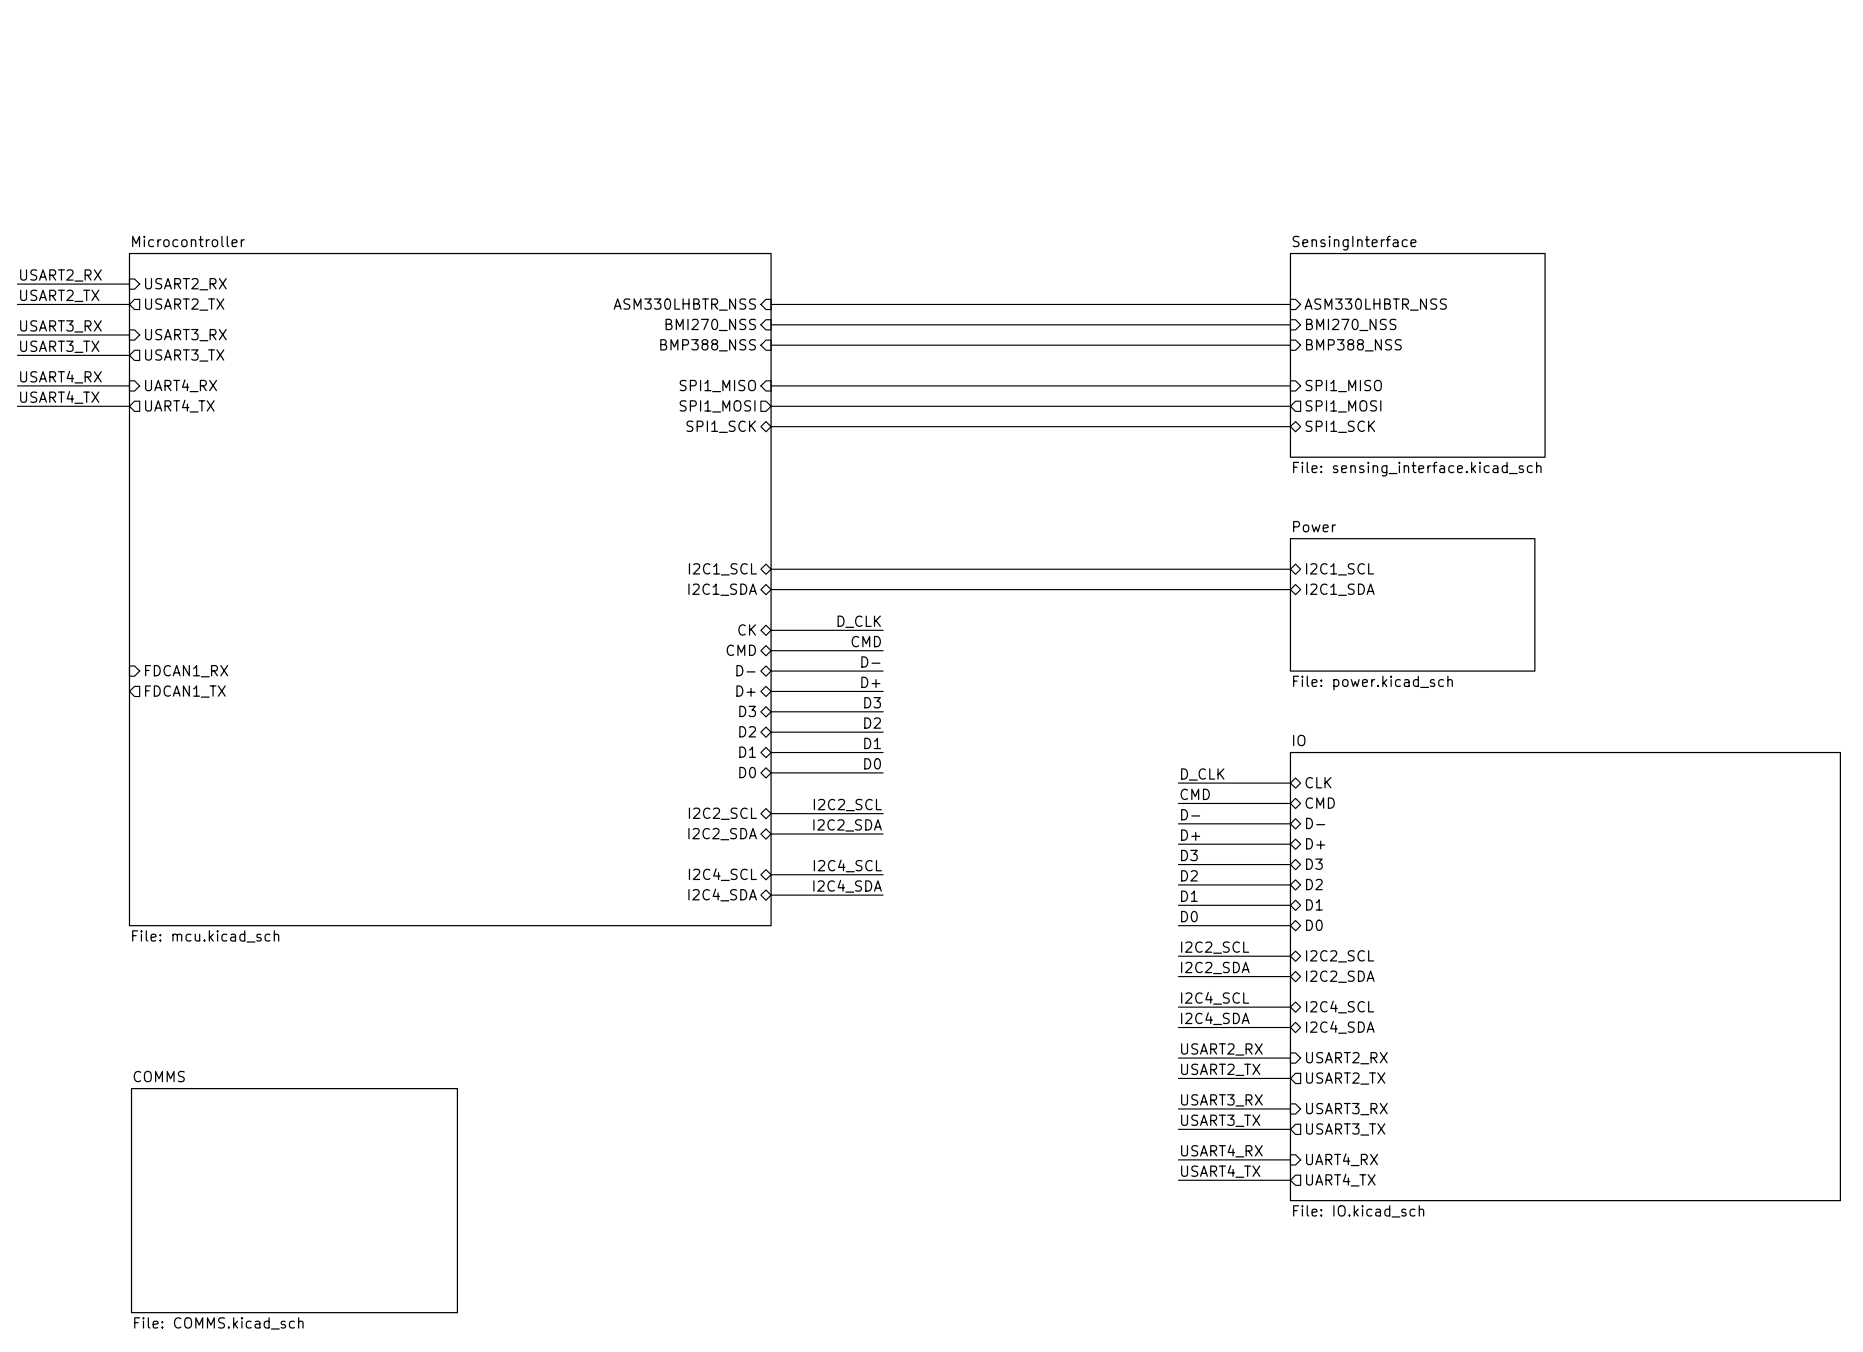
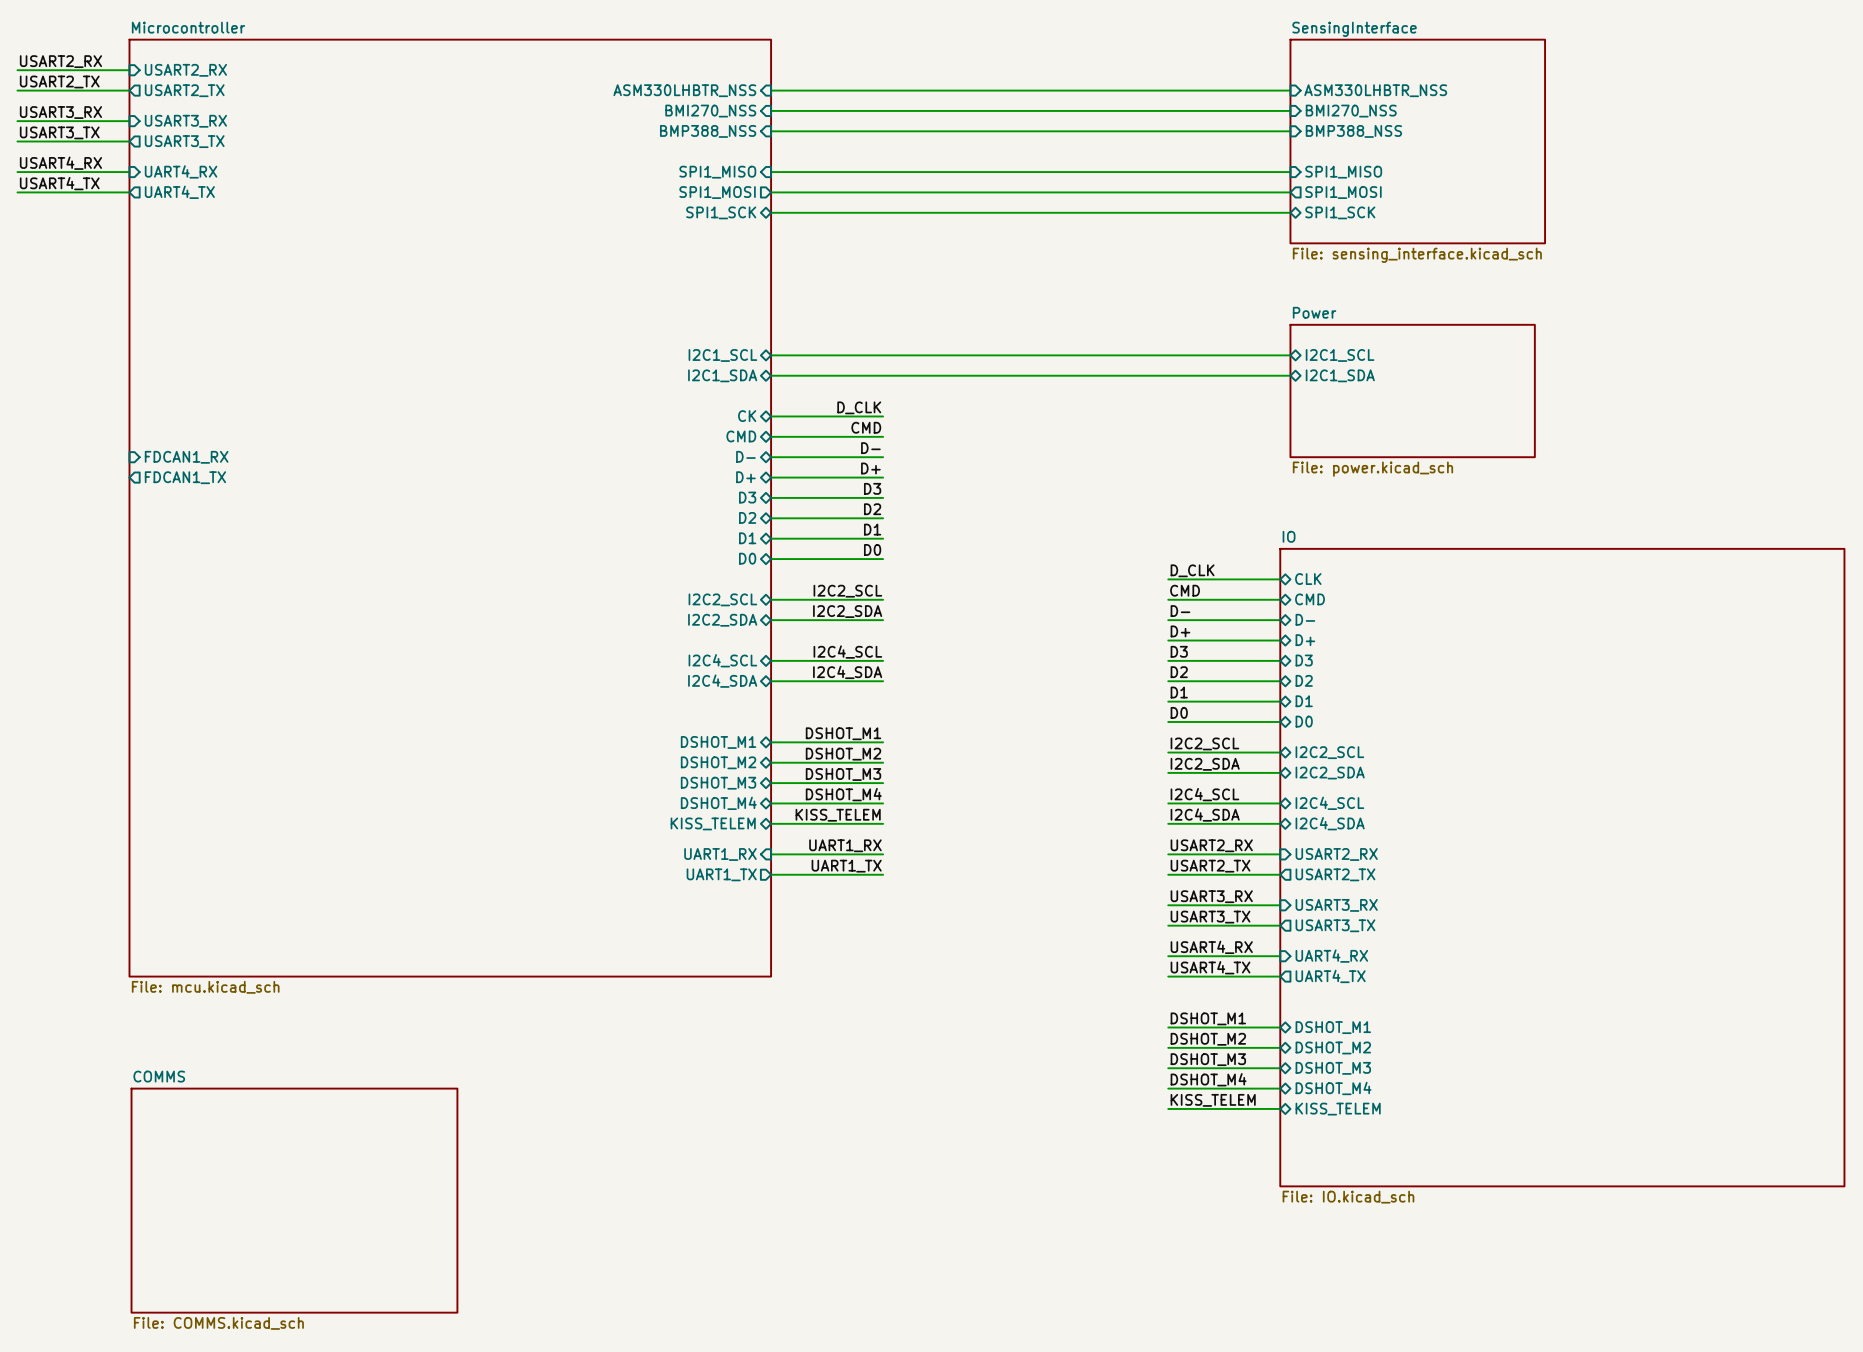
label: none -> USART2_RX (60, 61)
wire: none -> (17, 70) (129, 70)
sheet pin: none -> USART2_RX (185, 70)
label: none -> USART2_TX (59, 81)
sheet pin: none -> USART2_TX (184, 90)
sheet pin: none -> ASM330LHBTR_NSS (684, 90)
wire: none -> (771, 90) (1290, 90)
sheet pin: none -> ASM330LHBTR_NSS (1375, 90)
sheet pin: none -> BMI270_NSS (710, 111)
sheet pin: none -> BMI270_NSS (1351, 111)
label: none -> USART3_RX (60, 112)
wire: none -> (17, 121) (129, 121)
sheet pin: none -> USART3_RX (185, 121)
sheet pin: none -> BMP388_NSS (708, 131)
sheet pin: none -> BMP388_NSS (1353, 131)
label: none -> USART3_TX (59, 132)
sheet pin: none -> USART3_TX (184, 141)
sheet SensingInterface: none -> File: sensing_interface.kicad_sch (1417, 141)
label: none -> USART4_RX (60, 163)
sheet pin: none -> UART4_RX (181, 171)
sheet pin: none -> SPI1_MISO (717, 172)
sheet pin: none -> SPI1_MISO (1343, 172)
label: none -> USART4_TX (59, 183)
sheet pin: none -> UART4_TX (179, 192)
sheet pin: none -> SPI1_MOSI (717, 192)
sheet pin: none -> SPI1_MOSI (1343, 192)
sheet pin: none -> SPI1_SCK (721, 212)
sheet pin: none -> SPI1_SCK (1340, 212)
label: USART2_RX (60, 275) -> none
wire: (17, 284) (129, 284) -> (17, 90) (129, 90)
sheet pin: USART2_RX (185, 284) -> none
label: USART2_TX (59, 295) -> none
wire: (17, 304) (129, 304) -> (17, 172) (129, 172)
sheet pin: USART2_TX (184, 304) -> none
sheet pin: ASM330LHBTR_NSS (684, 304) -> none
wire: (771, 304) (1290, 304) -> (771, 110) (1290, 110)
sheet pin: ASM330LHBTR_NSS (1375, 304) -> none
sheet pin: BMI270_NSS (710, 324) -> none
wire: (771, 324) (1290, 324) -> (771, 131) (1290, 131)
sheet pin: BMI270_NSS (1351, 324) -> none
label: USART3_RX (60, 326) -> none
wire: (17, 335) (129, 335) -> (17, 141) (129, 141)
sheet pin: USART3_RX (185, 335) -> none
sheet pin: BMP388_NSS (708, 345) -> none
wire: (771, 345) (1290, 345) -> (771, 172) (1290, 172)
sheet pin: BMP388_NSS (1353, 345) -> none
label: USART3_TX (59, 346) -> none
wire: (17, 355) (129, 355) -> none
sheet pin: USART3_TX (184, 355) -> none
sheet pin: none -> I2C1_SCL (722, 355)
sheet pin: none -> I2C1_SCL (1340, 355)
sheet SensingInterface: File: sensing_interface.kicad_sch (1417, 355) -> none
sheet pin: none -> I2C1_SDA (722, 375)
sheet pin: none -> I2C1_SDA (1340, 375)
label: USART4_RX (60, 377) -> none
wire: (17, 385) (129, 385) -> (17, 192) (129, 192)
sheet pin: UART4_RX (181, 385) -> none
wire: (771, 385) (1290, 385) -> (771, 192) (1290, 192)
sheet pin: SPI1_MISO (717, 386) -> none
sheet pin: SPI1_MISO (1343, 386) -> none
sheet Power: none -> File: power.kicad_sch (1412, 391)
label: USART4_TX (59, 397) -> none
wire: (17, 406) (129, 406) -> none
sheet pin: UART4_TX (179, 406) -> none
sheet pin: SPI1_MOSI (717, 406) -> none
wire: (771, 406) (1290, 406) -> (771, 212) (1290, 212)
sheet pin: SPI1_MOSI (1343, 406) -> none
label: none -> D_CLK (859, 407)
sheet pin: none -> CK (747, 416)
wire: none -> (771, 416) (883, 416)
sheet pin: SPI1_SCK (721, 426) -> none
wire: (771, 426) (1290, 426) -> (771, 355) (1290, 355)
sheet pin: SPI1_SCK (1340, 426) -> none
label: none -> CMD (866, 427)
sheet pin: none -> CMD (741, 436)
label: none -> D- (870, 448)
sheet pin: none -> D- (745, 456)
sheet pin: none -> FDCAN1_RX (186, 457)
label: none -> D+ (870, 468)
sheet pin: none -> FDCAN1_TX (185, 477)
sheet pin: none -> D+ (745, 477)
label: none -> D3 (872, 488)
sheet pin: none -> D3 (747, 497)
sheet Microcontroller: none -> File: mcu.kicad_sch (450, 508)
label: none -> D2 (872, 509)
sheet pin: none -> D2 (747, 517)
label: none -> D1 (872, 529)
sheet pin: none -> D1 (747, 538)
label: none -> D0 (872, 549)
sheet pin: none -> D0 (747, 558)
sheet pin: I2C1_SCL (722, 569) -> none
wire: (771, 569) (1290, 569) -> (771, 375) (1290, 375)
sheet pin: I2C1_SCL (1340, 569) -> none
label: none -> D_CLK (1192, 570)
wire: none -> (1168, 579) (1280, 579)
sheet pin: none -> CLK (1308, 579)
sheet Microcontroller: File: mcu.kicad_sch (450, 589) -> none
sheet pin: I2C1_SDA (722, 589) -> I2C2_SCL (722, 599)
wire: (771, 589) (1290, 589) -> none
sheet pin: I2C1_SDA (1340, 589) -> none
label: none -> CMD (1185, 590)
label: none -> I2C2_SCL (847, 591)
wire: none -> (771, 599) (883, 599)
wire: none -> (1168, 599) (1280, 599)
sheet pin: none -> CMD (1310, 599)
sheet Power: File: power.kicad_sch (1412, 604) -> none
label: none -> I2C2_SDA (847, 611)
label: none -> D- (1180, 611)
sheet pin: none -> D- (1305, 619)
sheet pin: none -> I2C2_SDA (722, 620)
wire: none -> (1168, 620) (1280, 620)
label: D_CLK (859, 621) -> none
sheet pin: CK (747, 629) -> none
wire: (771, 630) (883, 630) -> (771, 436) (883, 436)
label: none -> D+ (1180, 631)
wire: none -> (1168, 640) (1280, 640)
sheet pin: none -> D+ (1305, 640)
label: CMD (866, 641) -> none
sheet pin: CMD (741, 650) -> none
wire: (771, 650) (883, 650) -> (771, 457) (883, 457)
label: none -> D3 (1179, 651)
label: none -> I2C4_SCL (847, 652)
sheet pin: none -> I2C4_SCL (722, 660)
sheet pin: none -> D3 (1304, 660)
label: D- (870, 661) -> none
sheet pin: D- (745, 670) -> none
sheet pin: FDCAN1_RX (186, 671) -> none
wire: (771, 671) (883, 671) -> (771, 477) (883, 477)
label: none -> I2C4_SDA (847, 672)
label: none -> D2 (1179, 672)
sheet pin: none -> D2 (1304, 680)
sheet pin: none -> I2C4_SDA (722, 681)
wire: none -> (1168, 681) (1280, 681)
label: D+ (870, 682) -> none
sheet pin: FDCAN1_TX (185, 691) -> none
sheet pin: D+ (745, 691) -> none
wire: (771, 691) (883, 691) -> (771, 497) (883, 497)
label: none -> D1 (1179, 692)
wire: none -> (1168, 701) (1280, 701)
sheet pin: none -> D1 (1304, 701)
label: D3 (872, 702) -> none
sheet pin: D3 (747, 711) -> none
wire: (771, 711) (883, 711) -> (771, 518) (883, 518)
label: none -> D0 (1179, 712)
wire: none -> (1168, 721) (1280, 721)
sheet pin: none -> D0 (1304, 721)
label: D2 (872, 723) -> none
sheet pin: D2 (747, 731) -> none
wire: (771, 732) (883, 732) -> (771, 538) (883, 538)
label: none -> DSHOT_M1 (843, 733)
sheet pin: none -> DSHOT_M1 (718, 742)
wire: none -> (771, 742) (883, 742)
label: D1 (872, 743) -> none
label: none -> I2C2_SCL (1204, 743)
sheet pin: D1 (747, 752) -> none
wire: (771, 752) (883, 752) -> (771, 559) (883, 559)
wire: none -> (1168, 752) (1280, 752)
sheet pin: none -> I2C2_SCL (1329, 752)
label: none -> DSHOT_M2 (843, 754)
sheet pin: none -> DSHOT_M2 (718, 762)
label: D0 (872, 763) -> none
label: none -> I2C2_SDA (1205, 764)
sheet pin: D0 (747, 772) -> none
wire: (771, 772) (883, 772) -> (771, 660) (883, 660)
sheet pin: none -> I2C2_SDA (1330, 773)
label: none -> DSHOT_M3 (843, 774)
label: D_CLK (1202, 774) -> none
sheet pin: CLK (1318, 782) -> none
sheet pin: none -> DSHOT_M3 (718, 783)
wire: none -> (771, 783) (883, 783)
wire: (1178, 783) (1290, 783) -> (1168, 772) (1280, 772)
label: none -> DSHOT_M4 (843, 794)
label: CMD (1195, 794) -> none
label: none -> I2C4_SCL (1204, 794)
sheet pin: none -> DSHOT_M4 (718, 803)
wire: none -> (771, 803) (883, 803)
wire: (1280, 803) (1290, 803) -> (1168, 803) (1178, 803)
sheet pin: CMD (1320, 803) -> none
sheet pin: none -> I2C4_SCL (1329, 803)
label: I2C2_SCL (847, 805) -> none
sheet pin: I2C2_SCL (722, 813) -> none
wire: (771, 813) (883, 813) -> (771, 620) (883, 620)
label: D- (1190, 814) -> none
label: none -> I2C4_SDA (1205, 814)
label: none -> KISS_TELEM (838, 815)
sheet pin: none -> KISS_TELEM (713, 823)
wire: none -> (771, 823) (883, 823)
wire: (1280, 823) (1290, 823) -> (1168, 823) (1178, 823)
sheet pin: D- (1315, 823) -> none
sheet pin: none -> I2C4_SDA (1330, 823)
label: I2C2_SDA (847, 825) -> none
sheet pin: I2C2_SDA (722, 834) -> none
wire: (771, 834) (883, 834) -> (771, 681) (883, 681)
label: D+ (1190, 835) -> none
sheet pin: D+ (1315, 843) -> none
wire: (1178, 844) (1290, 844) -> (1168, 660) (1280, 660)
label: none -> UART1_RX (845, 845)
label: none -> USART2_RX (1211, 845)
sheet pin: none -> UART1_RX (720, 854)
wire: none -> (771, 854) (883, 854)
sheet pin: none -> USART2_RX (1336, 854)
label: D3 (1189, 855) -> none
wire: (1178, 864) (1290, 864) -> (1168, 854) (1280, 854)
sheet pin: D3 (1314, 864) -> none
label: I2C4_SCL (847, 865) -> UART1_TX (846, 866)
label: none -> USART2_TX (1210, 866)
sheet IO: none -> File: IO.kicad_sch (1562, 867)
sheet pin shape: bidirectional (722, 874) -> output (721, 874)
sheet pin: I2C4_SCL (722, 874) -> UART1_TX (721, 874)
sheet pin: none -> USART2_TX (1335, 874)
label: D2 (1189, 875) -> none
wire: (1178, 884) (1290, 884) -> (1168, 874) (1280, 874)
sheet pin: D2 (1314, 884) -> none
label: I2C4_SDA (847, 886) -> none
sheet pin: I2C4_SDA (722, 894) -> none
wire: (771, 895) (883, 895) -> (771, 762) (883, 762)
label: D1 (1189, 896) -> none
label: none -> USART3_RX (1211, 896)
sheet pin: D1 (1314, 904) -> none
wire: (1280, 905) (1290, 905) -> (1168, 905) (1178, 905)
sheet pin: none -> USART3_RX (1336, 905)
label: D0 (1189, 916) -> none
label: none -> USART3_TX (1210, 917)
wire: (1280, 925) (1290, 925) -> (1168, 925) (1178, 925)
sheet pin: D0 (1314, 925) -> none
sheet pin: none -> USART3_TX (1335, 925)
label: none -> USART4_RX (1211, 947)
label: I2C2_SCL (1215, 947) -> none
wire: (1280, 956) (1290, 956) -> (1168, 956) (1178, 956)
sheet pin: none -> UART4_RX (1331, 956)
sheet pin: I2C2_SCL (1340, 956) -> none
label: none -> USART4_TX (1210, 967)
label: I2C2_SDA (1215, 967) -> none
wire: (1280, 976) (1290, 976) -> (1168, 976) (1178, 976)
sheet pin: none -> UART4_TX (1330, 976)
sheet pin: I2C2_SDA (1340, 976) -> none
sheet IO: File: IO.kicad_sch (1565, 976) -> none
label: I2C4_SCL (1215, 998) -> none
wire: (1178, 1007) (1290, 1007) -> none
sheet pin: I2C4_SCL (1340, 1007) -> none
label: none -> DSHOT_M1 (1208, 1018)
label: I2C4_SDA (1215, 1018) -> none
wire: (1280, 1027) (1290, 1027) -> (1168, 1027) (1178, 1027)
sheet pin: none -> DSHOT_M1 (1333, 1027)
sheet pin: I2C4_SDA (1340, 1027) -> none
label: none -> DSHOT_M2 (1208, 1039)
sheet pin: none -> DSHOT_M2 (1333, 1047)
label: USART2_RX (1221, 1049) -> none
wire: (1178, 1058) (1290, 1058) -> (1168, 1047) (1280, 1047)
sheet pin: USART2_RX (1346, 1058) -> none
label: none -> DSHOT_M3 (1208, 1059)
sheet pin: none -> DSHOT_M3 (1333, 1068)
label: USART2_TX (1220, 1069) -> none
wire: (1178, 1078) (1290, 1078) -> (1168, 1068) (1280, 1068)
sheet pin: USART2_TX (1345, 1078) -> none
label: none -> DSHOT_M4 (1208, 1079)
sheet pin: none -> DSHOT_M4 (1333, 1088)
label: none -> KISS_TELEM (1213, 1100)
label: USART3_RX (1221, 1100) -> none
wire: (1280, 1108) (1290, 1108) -> (1168, 1108) (1178, 1108)
sheet pin: none -> KISS_TELEM (1338, 1109)
sheet pin: USART3_RX (1346, 1109) -> none
label: USART3_TX (1220, 1120) -> none
wire: (1178, 1129) (1290, 1129) -> none
sheet pin: USART3_TX (1345, 1129) -> none
label: USART4_RX (1221, 1151) -> none
wire: (1178, 1159) (1290, 1159) -> none
sheet pin: UART4_RX (1342, 1159) -> none
label: USART4_TX (1220, 1171) -> none
wire: (1178, 1180) (1290, 1180) -> (1168, 1088) (1280, 1088)
sheet pin: UART4_TX (1340, 1180) -> none

